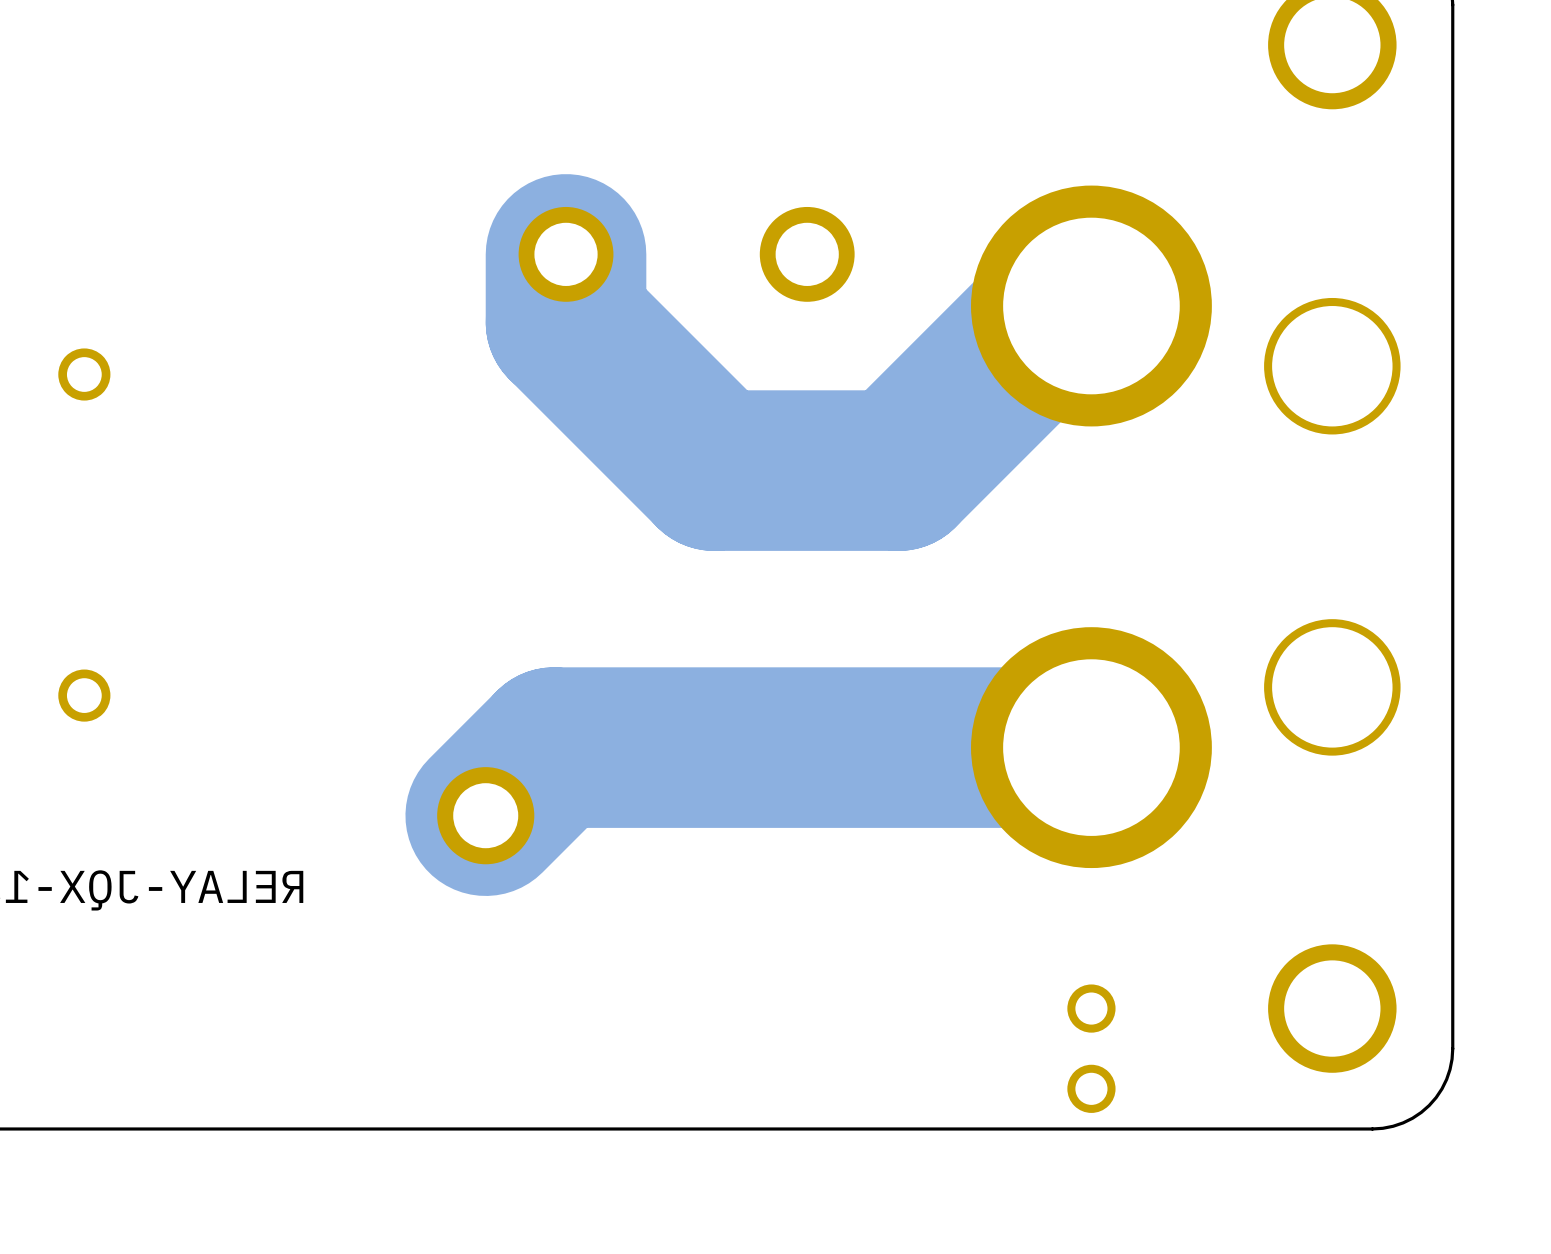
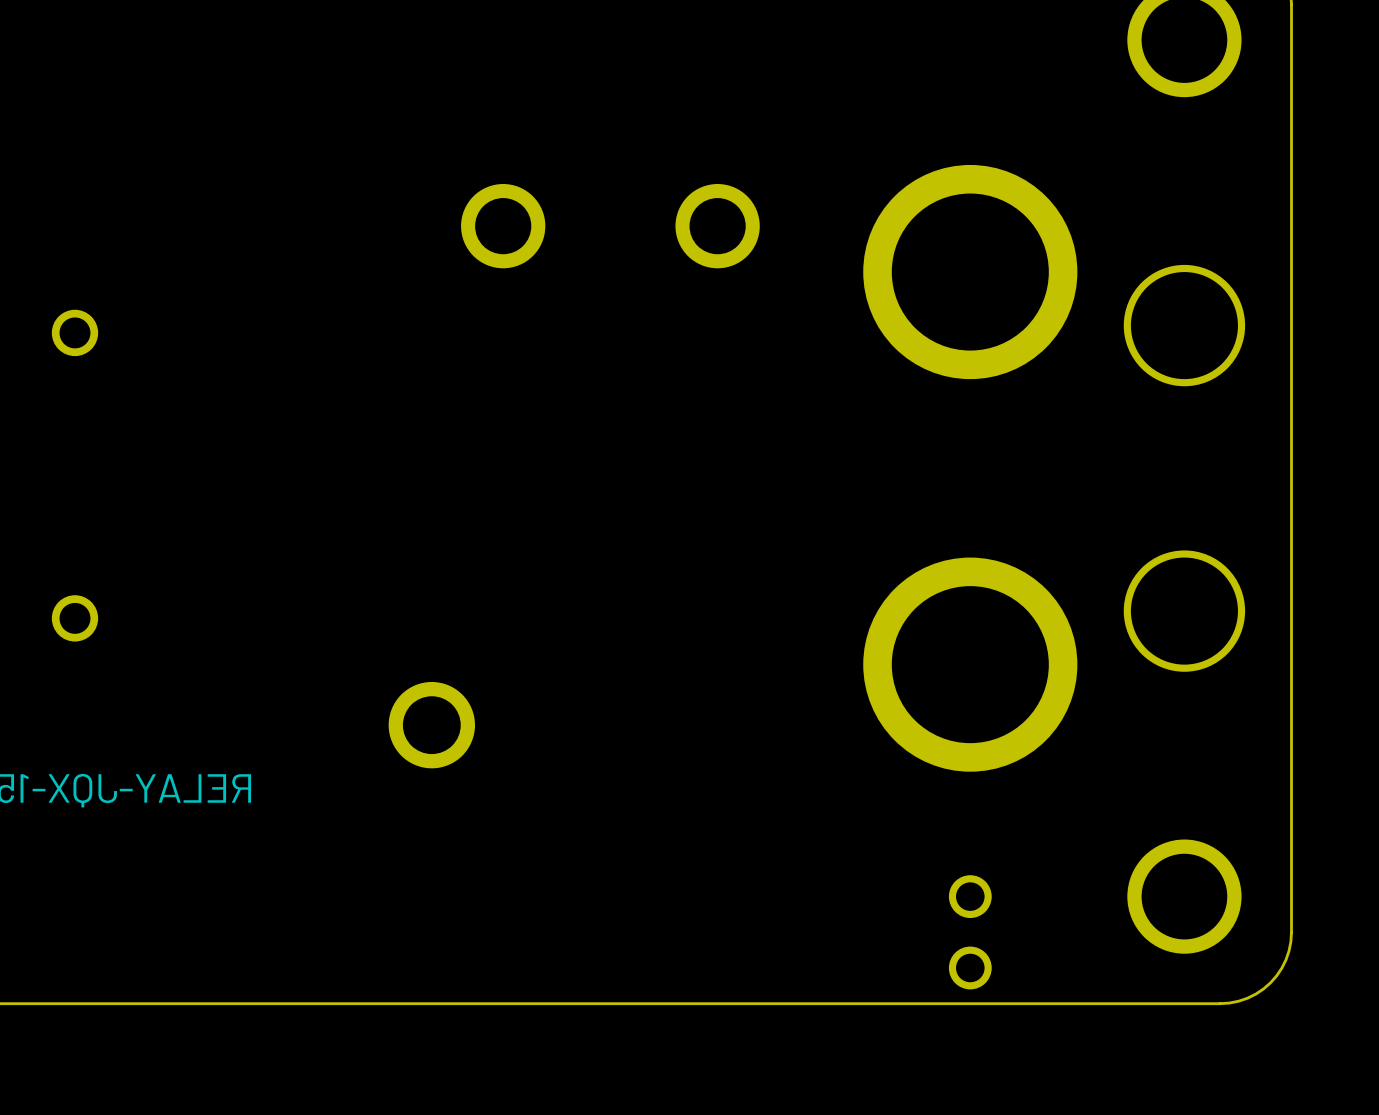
track: (566, 254) (566, 322) (714, 470) (898, 470) (1063, 306) (1091, 306) -> none
track: (1091, 747) (553, 747) (485, 815) -> none

